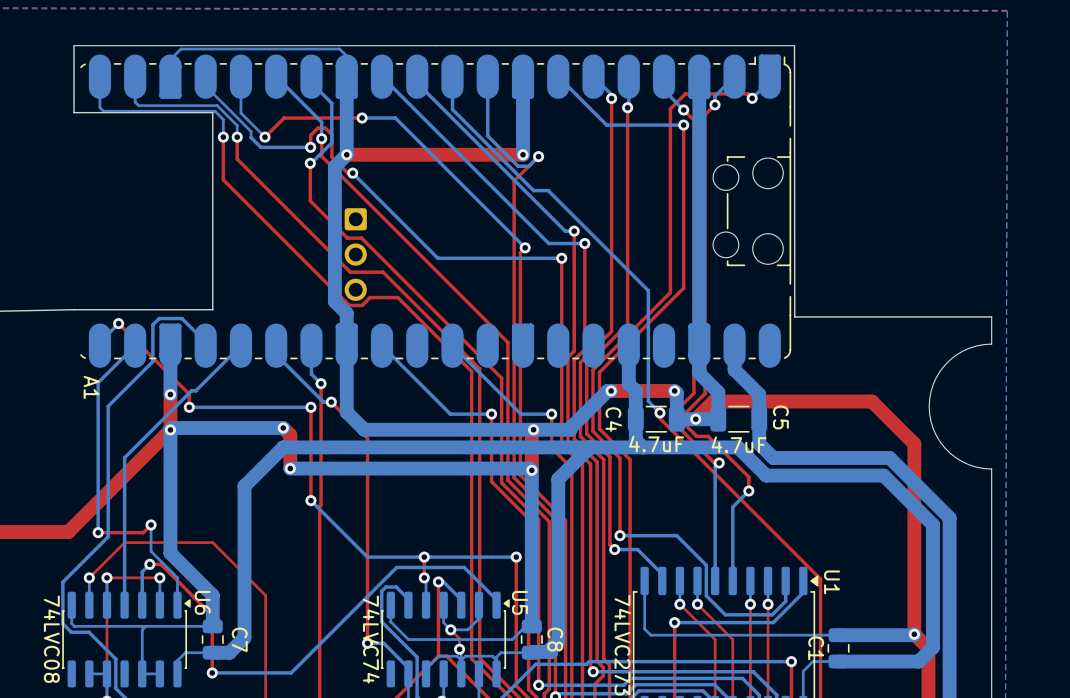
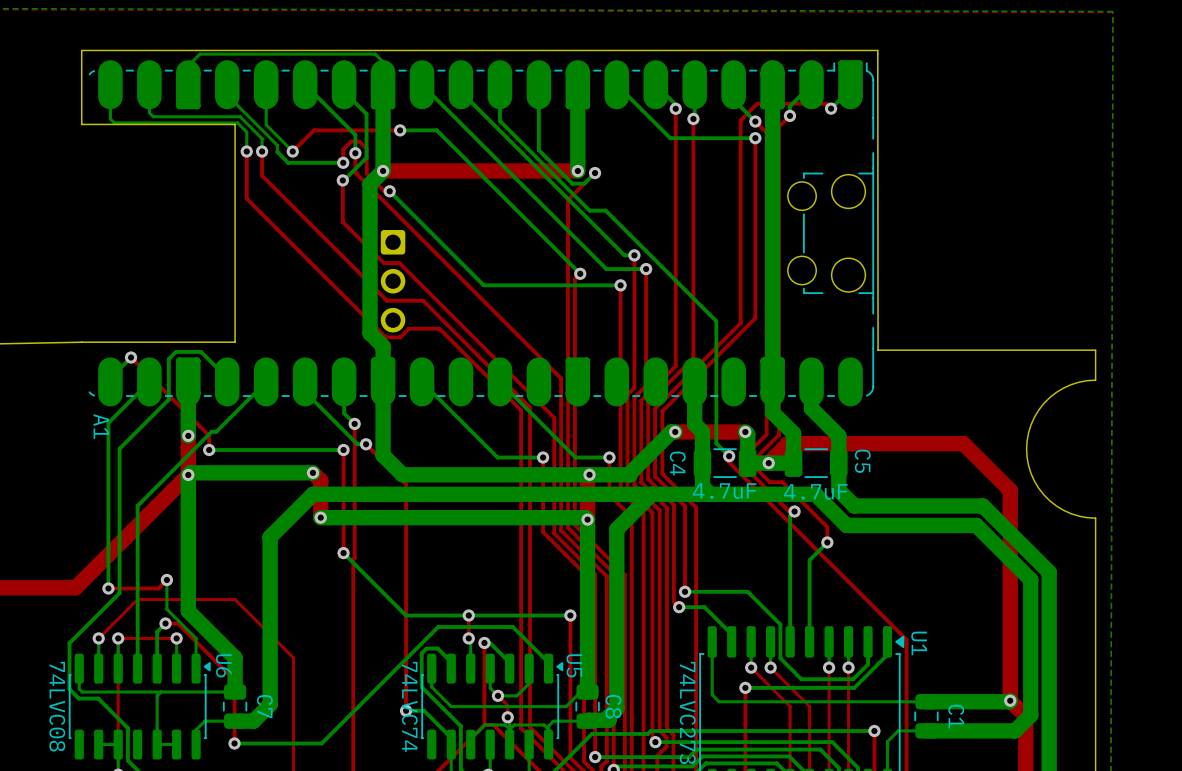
C1 name position: C1 (816, 648) -> C1 (956, 716)

